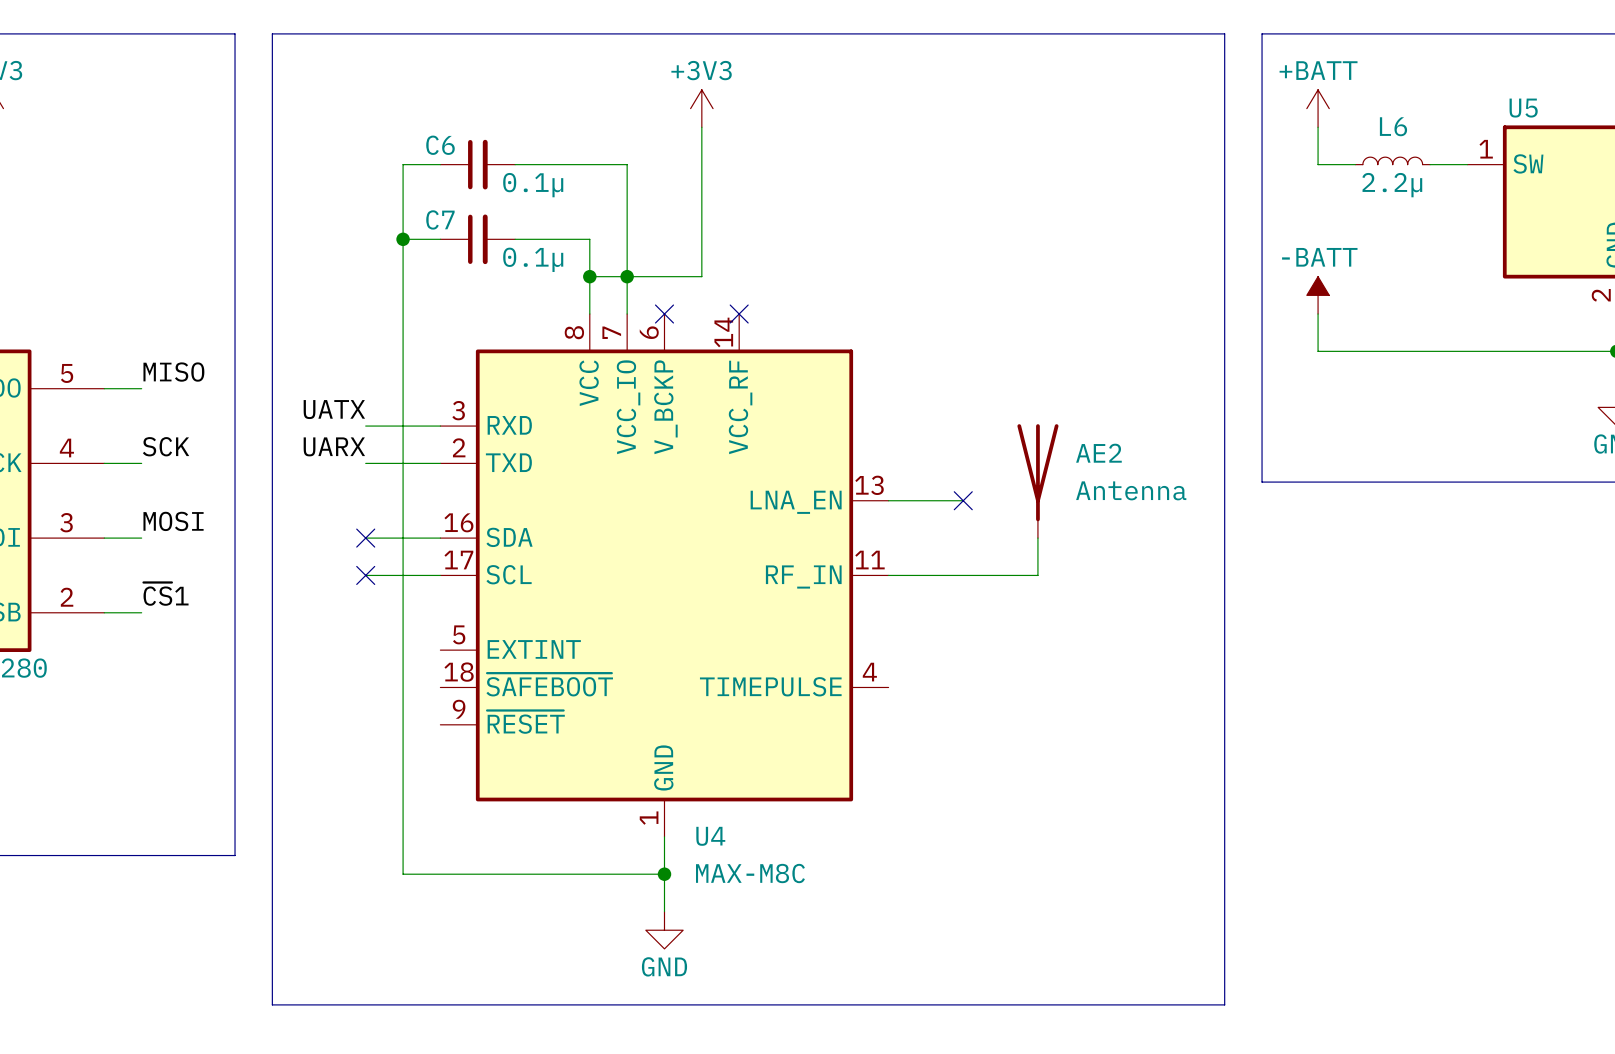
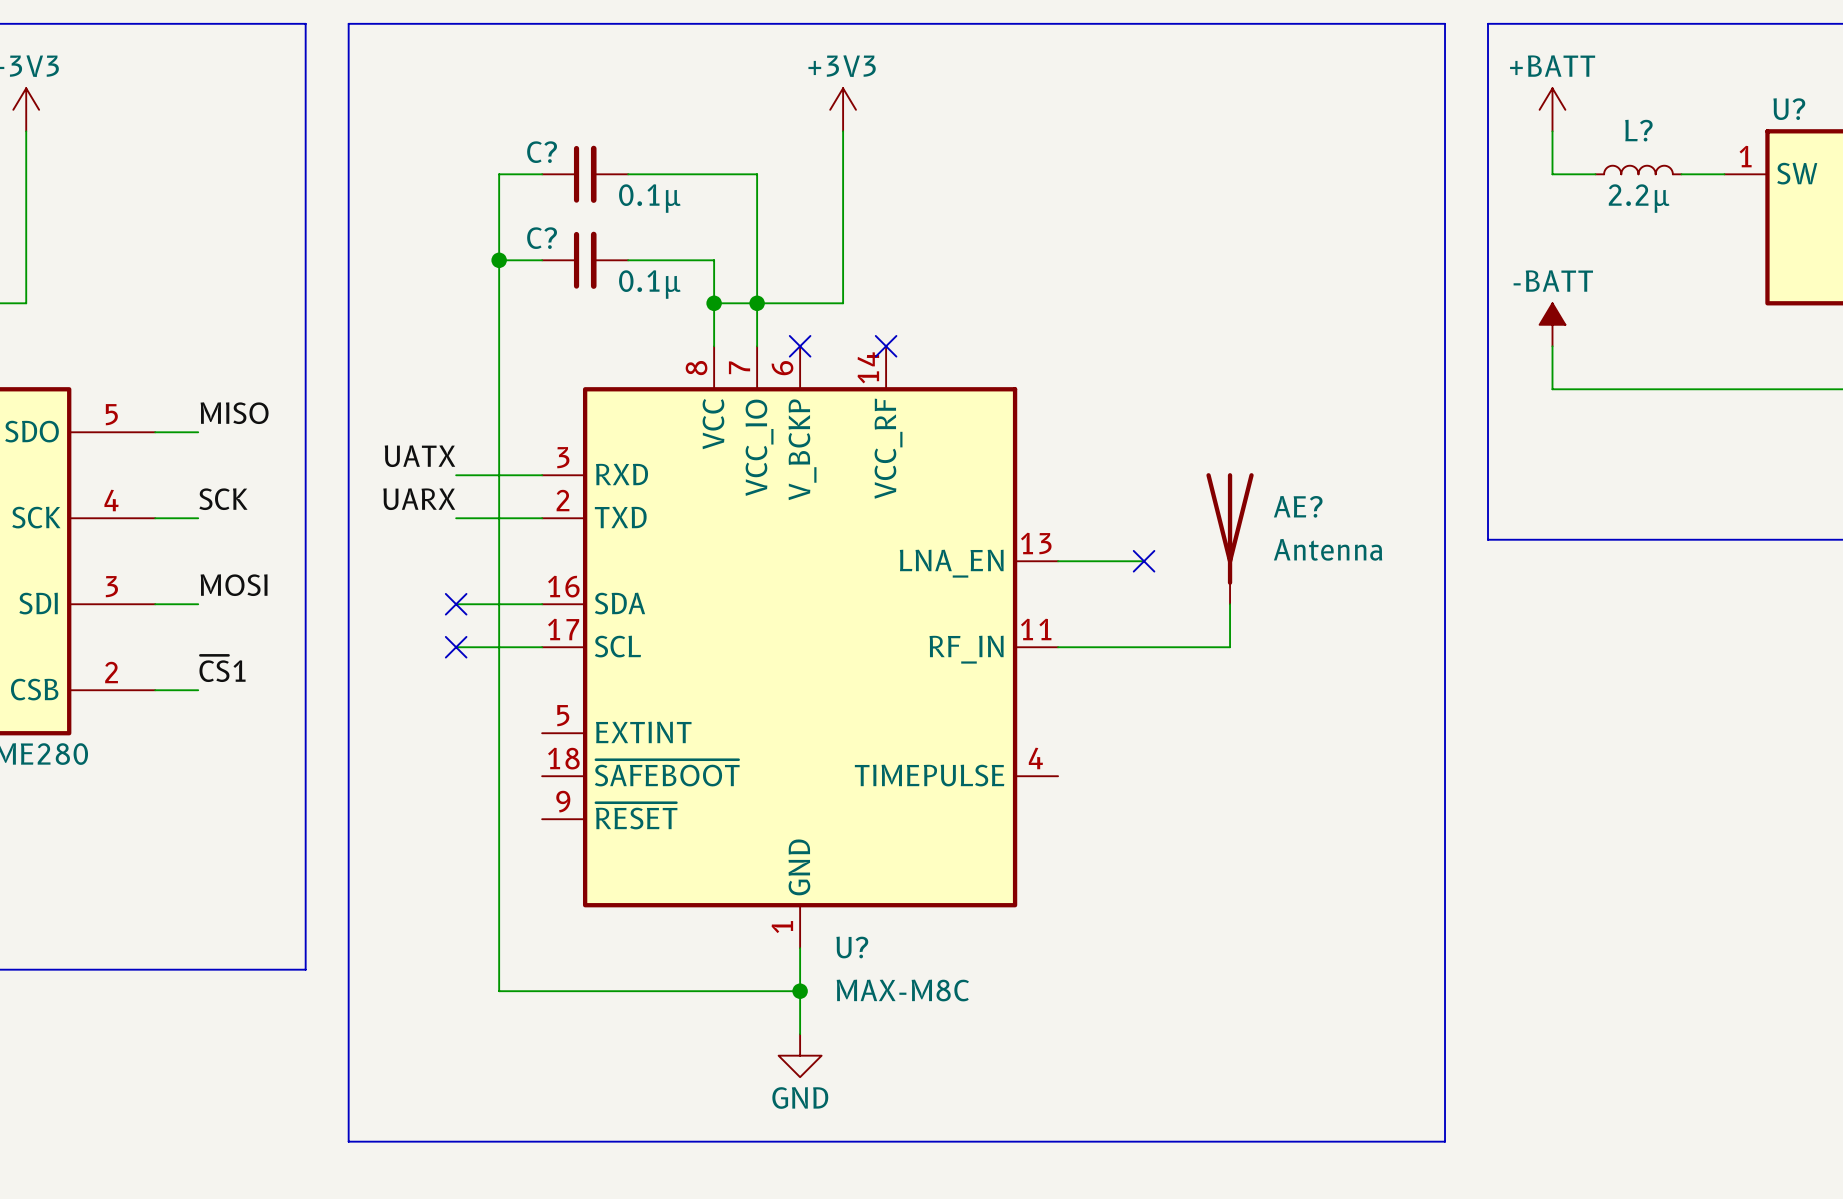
U5 name: U5 (1523, 108) -> U? (1789, 109)
L6 name: L6 (1393, 126) -> L? (1638, 130)
C6 name: C6 (440, 145) -> C? (542, 152)
C7 name: C7 (440, 219) -> C? (542, 238)
AE2 name: AE2 (1098, 453) -> AE? (1298, 506)
U4 name: U4 (710, 836) -> U? (852, 947)

